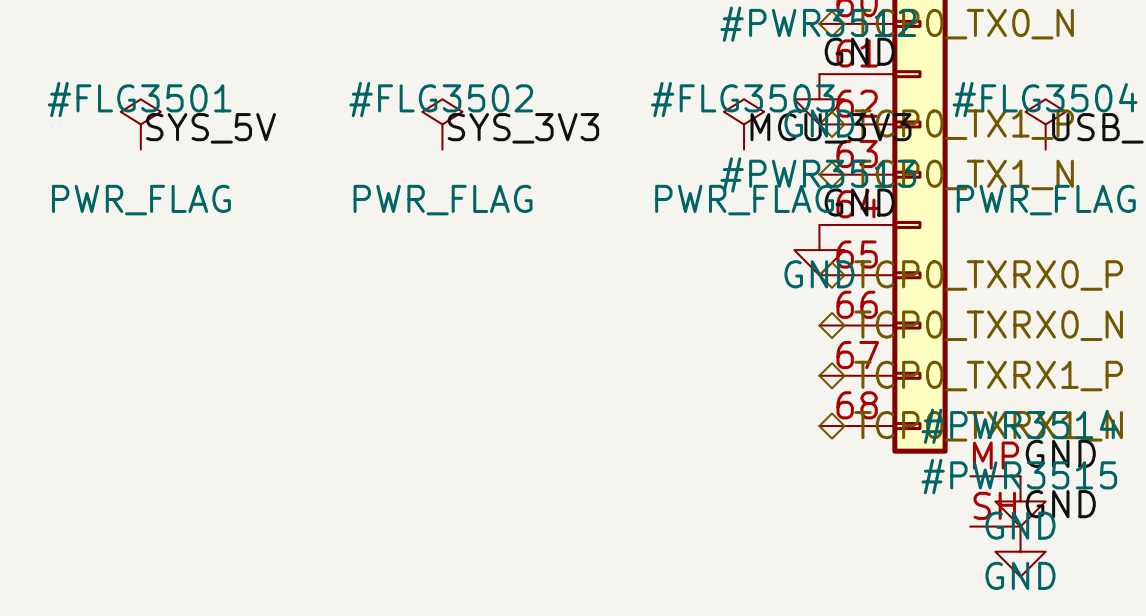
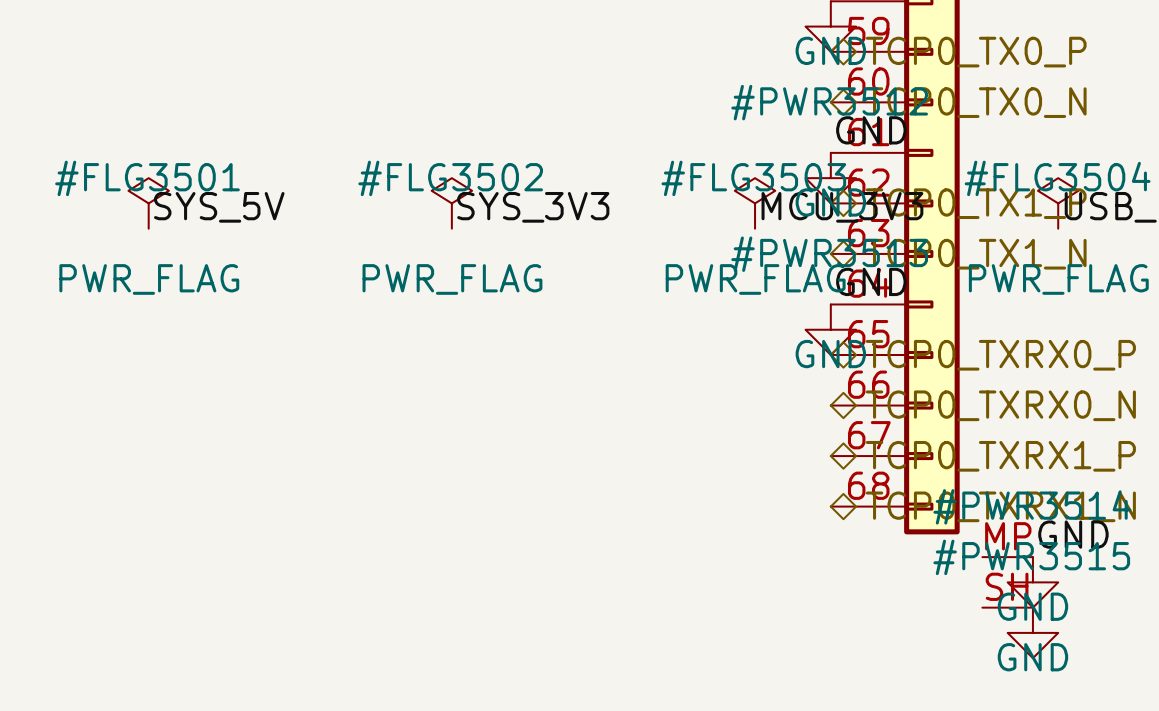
label: GND (1060, 504) -> none

